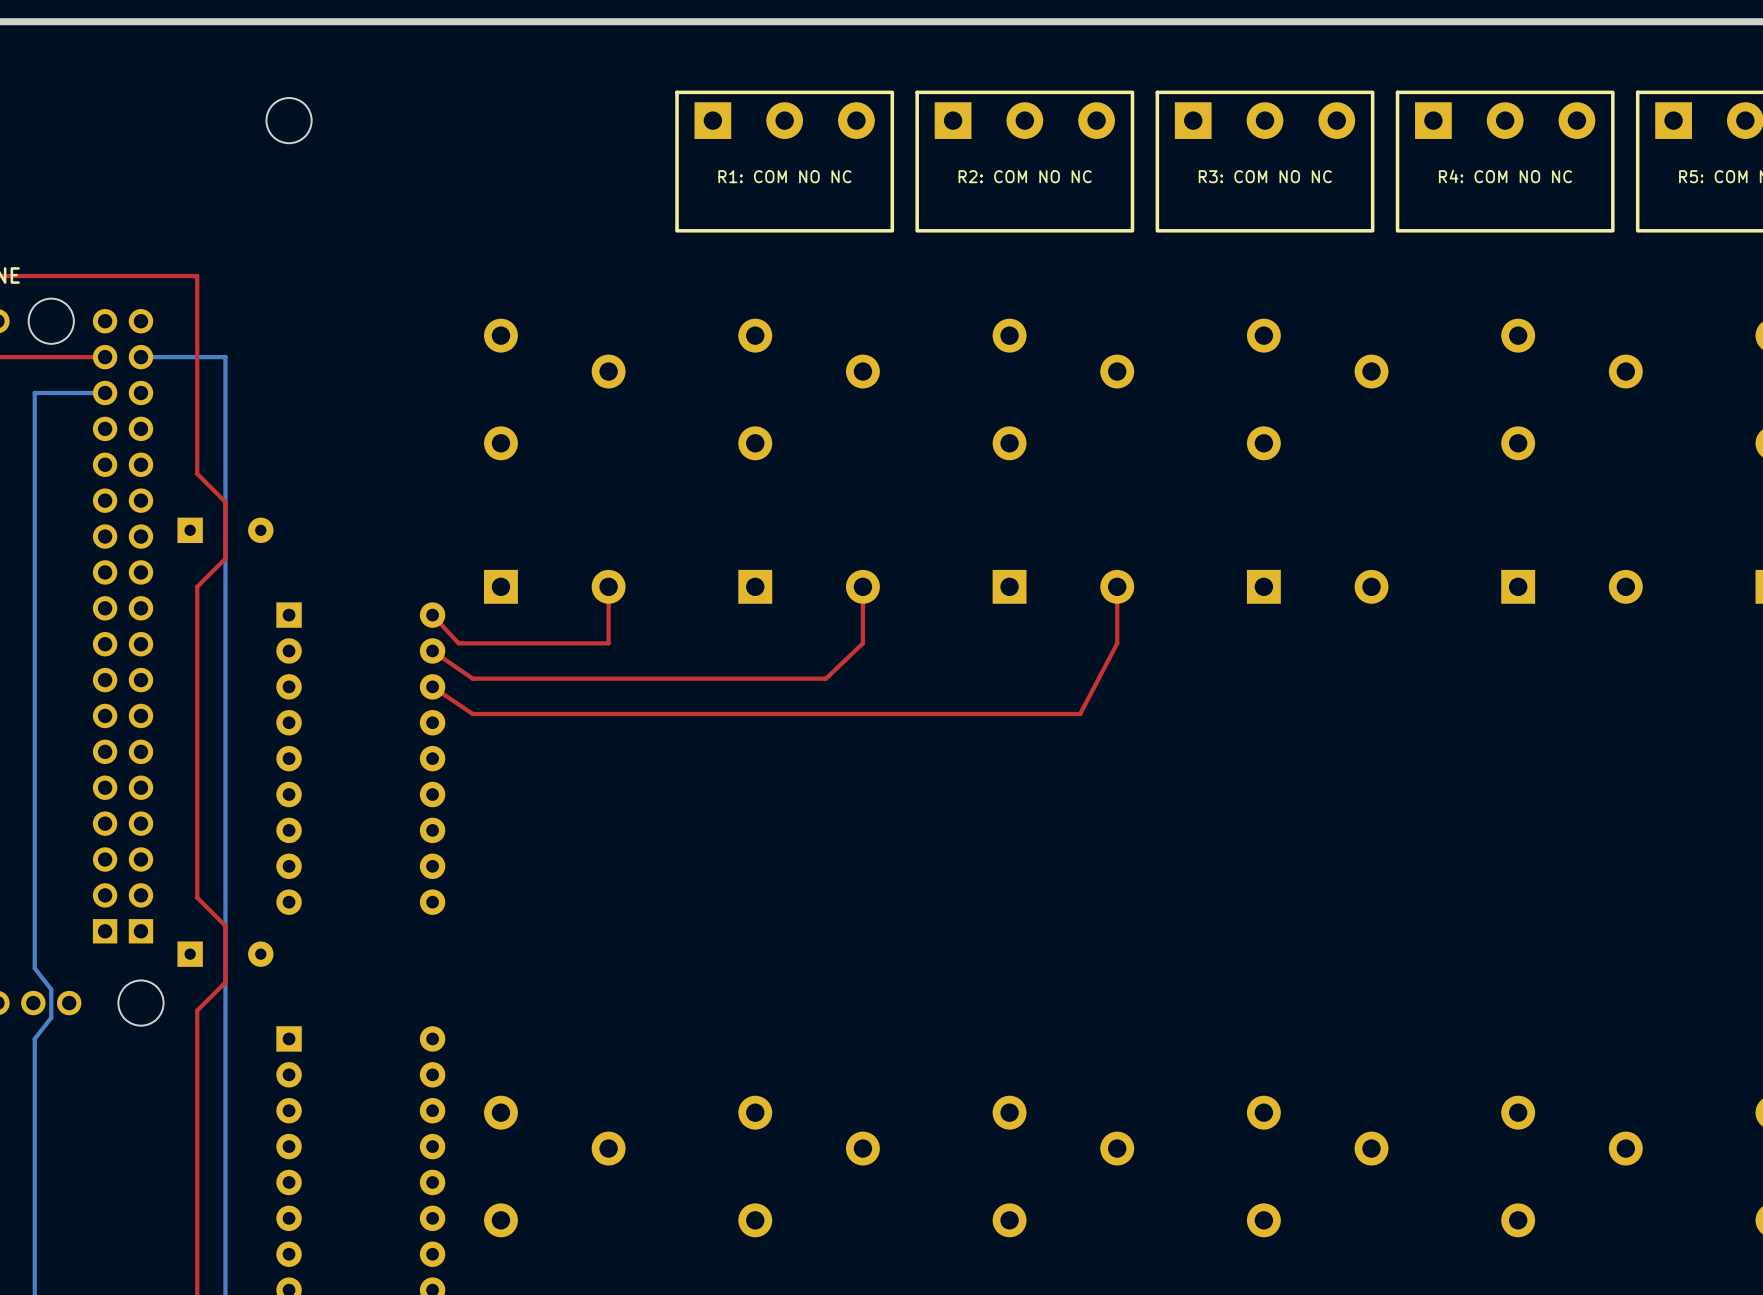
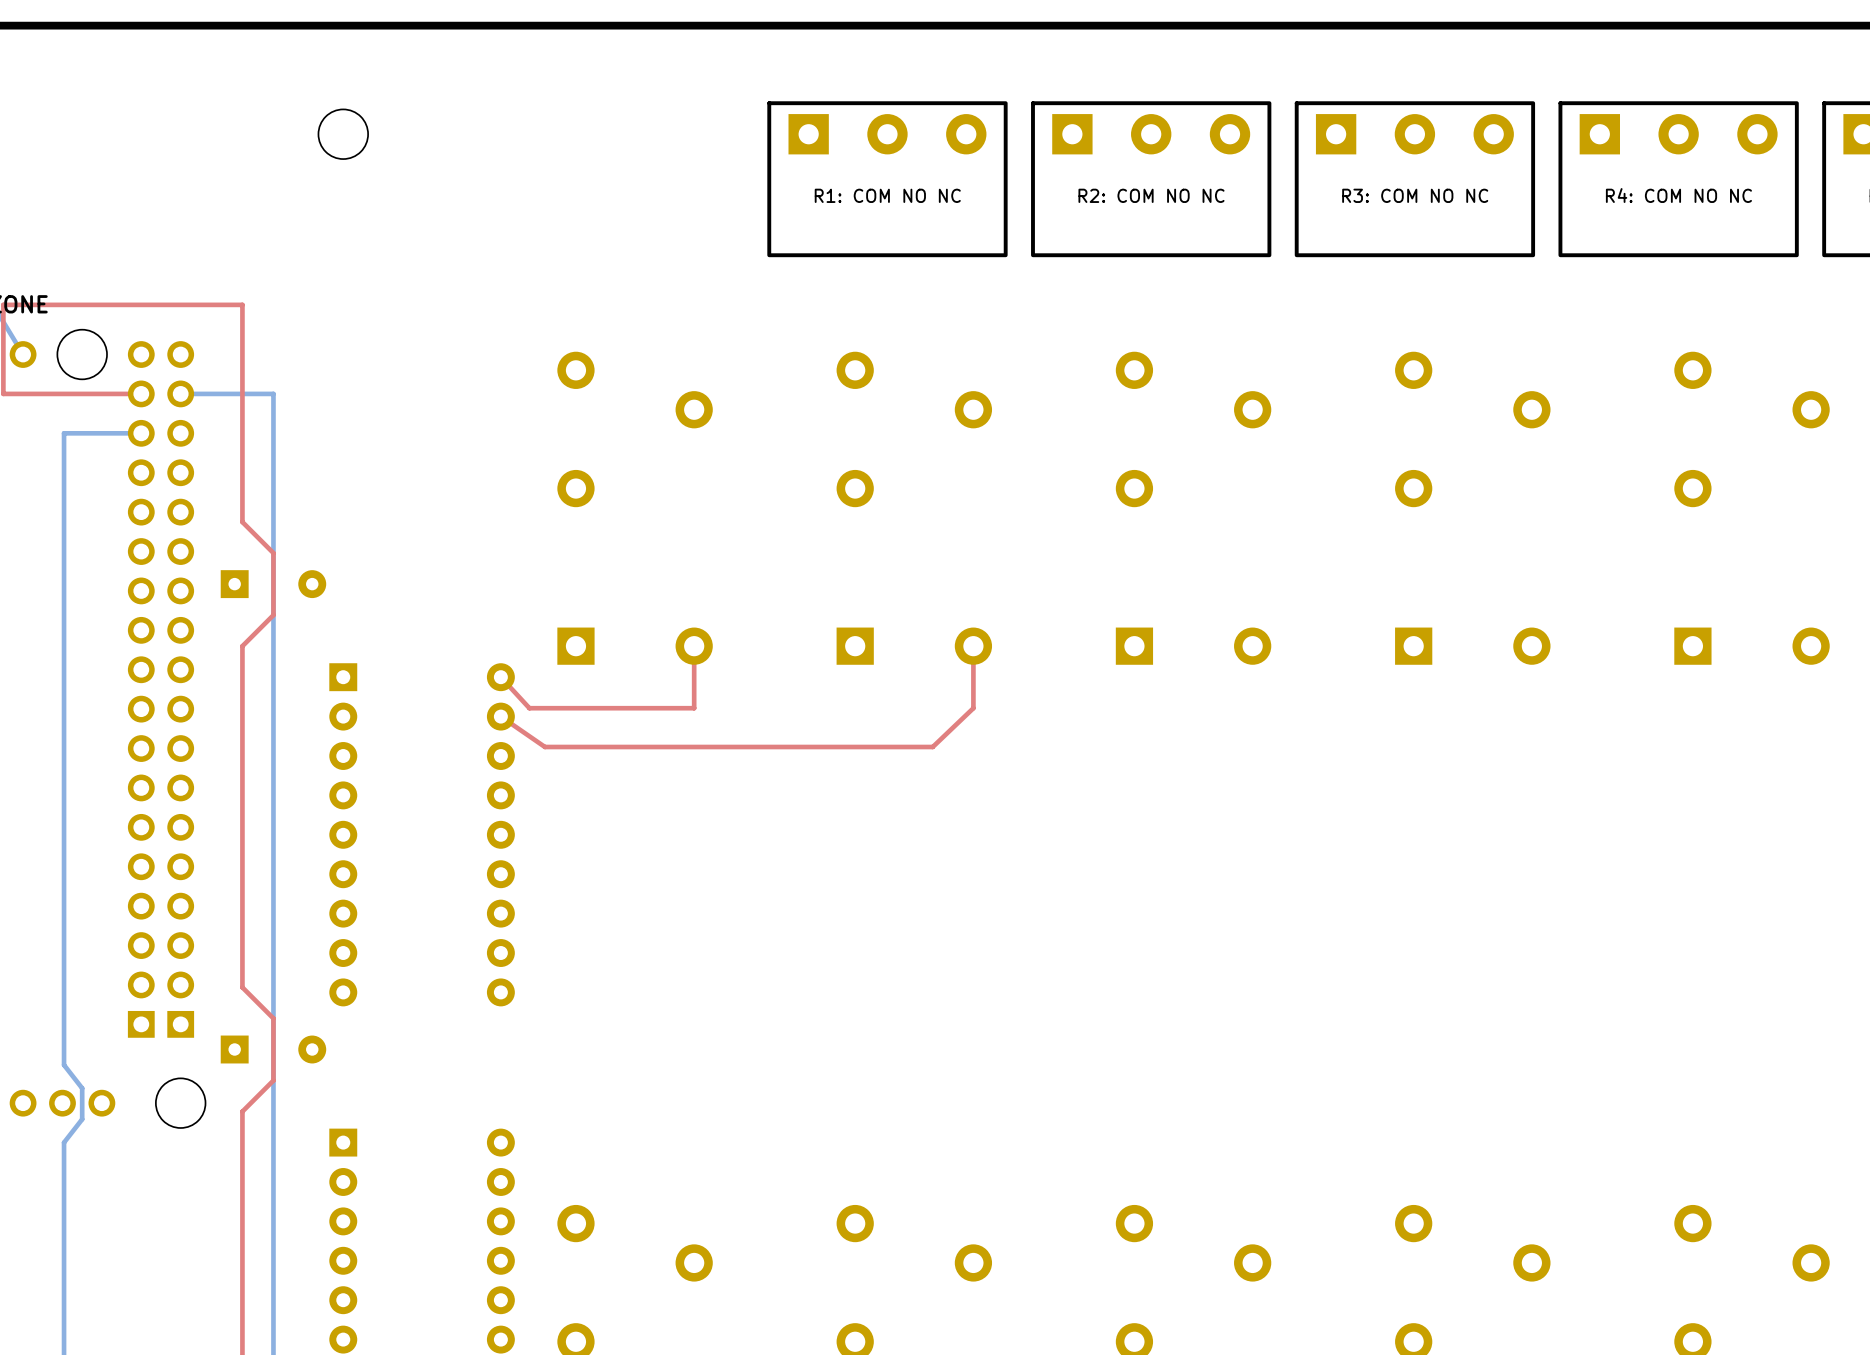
top track: (1117, 586) (1117, 643) (1080, 713) (472, 713) (432, 686) -> none

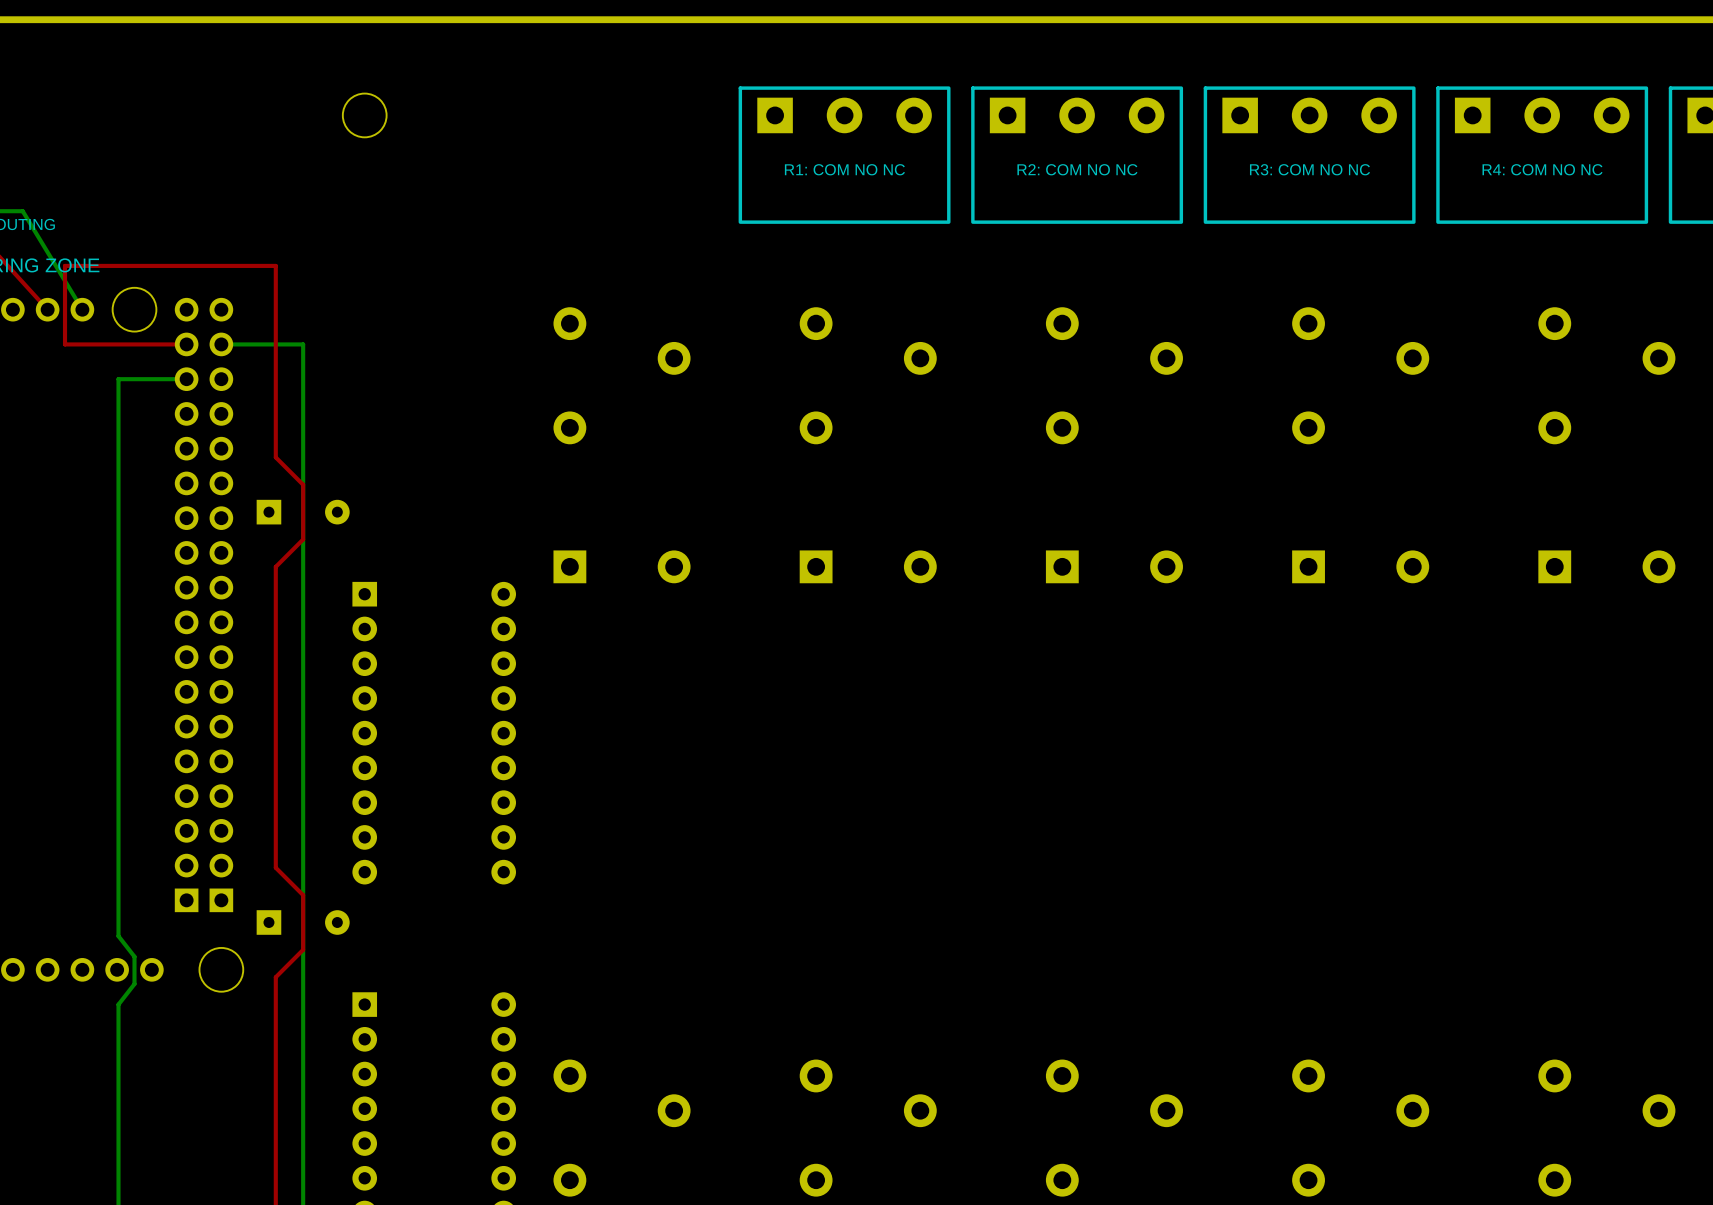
top track: (694, 646) (694, 708) (529, 708) (500, 677) -> none
top track: (973, 646) (973, 708) (932, 747) (544, 747) (500, 716) -> none

